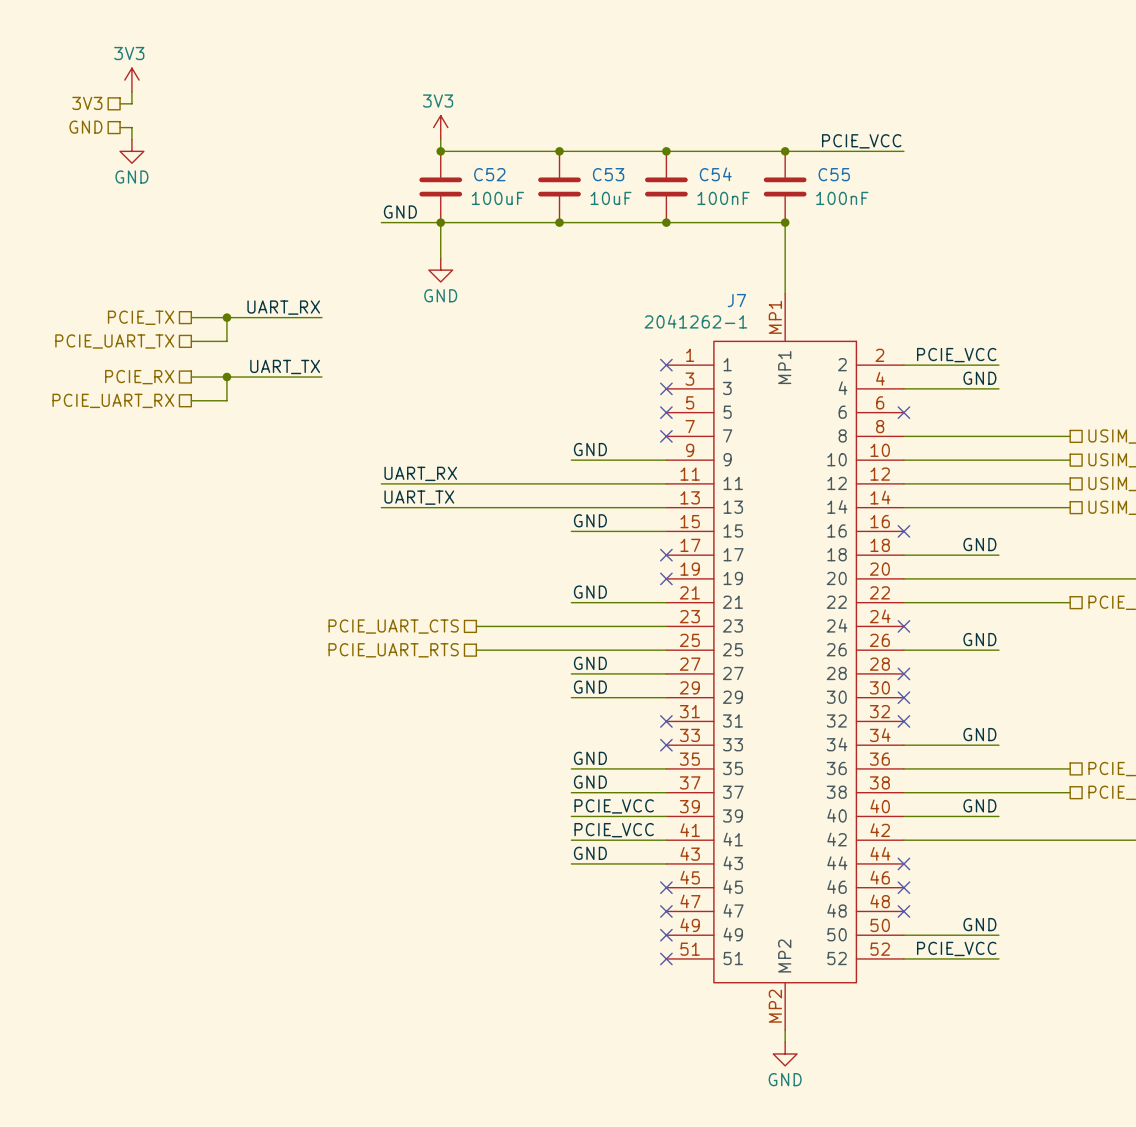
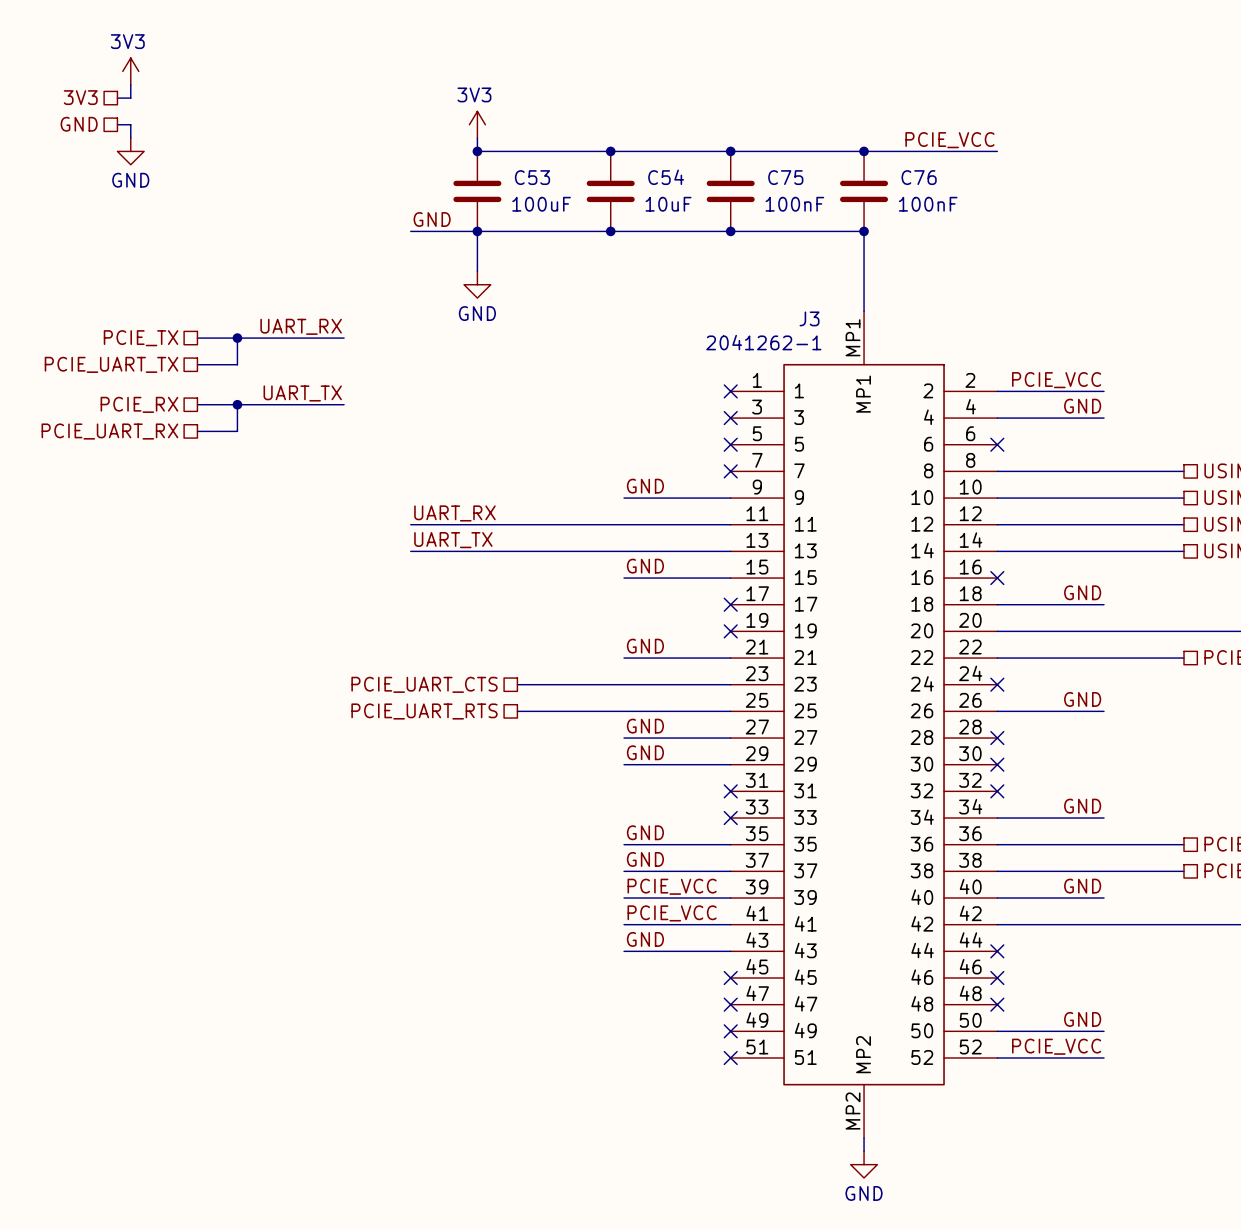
C52 name: C52 (489, 174) -> C53 (532, 177)
C53 name: C53 (608, 174) -> C54 (666, 177)
C54 name: C54 (715, 174) -> C75 (785, 177)
C55 name: C55 (834, 174) -> C76 (919, 177)
J7 name: J7 (736, 300) -> J3 (809, 318)

